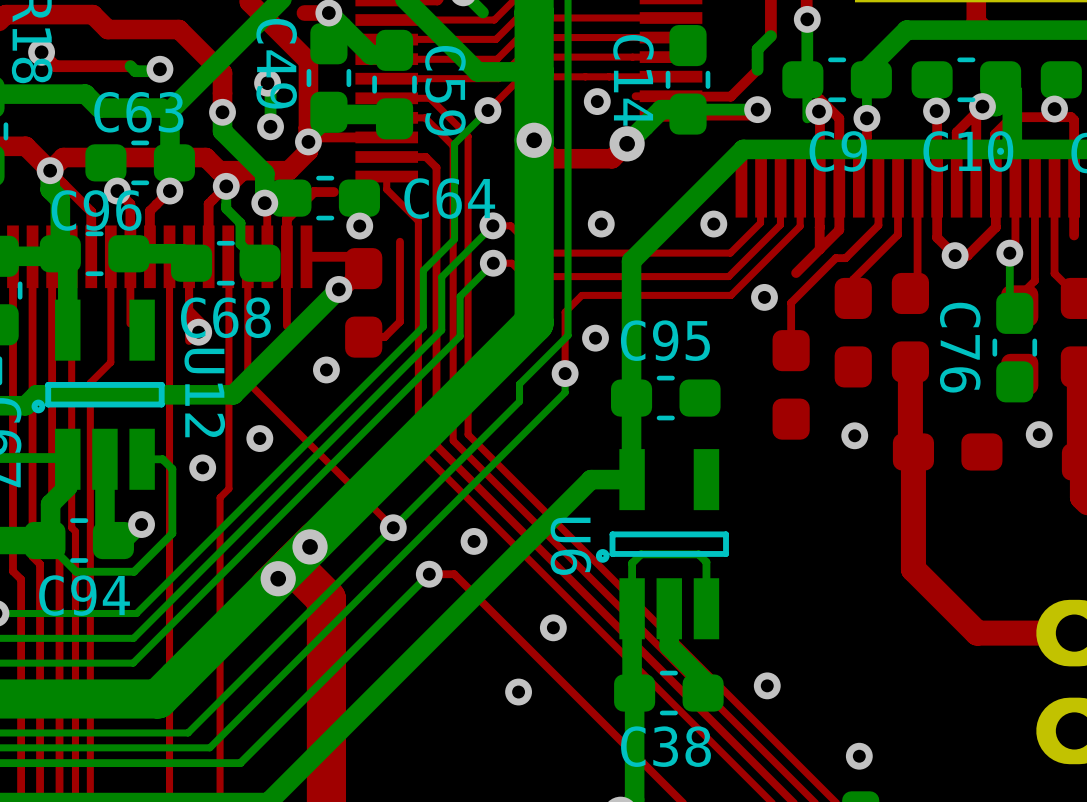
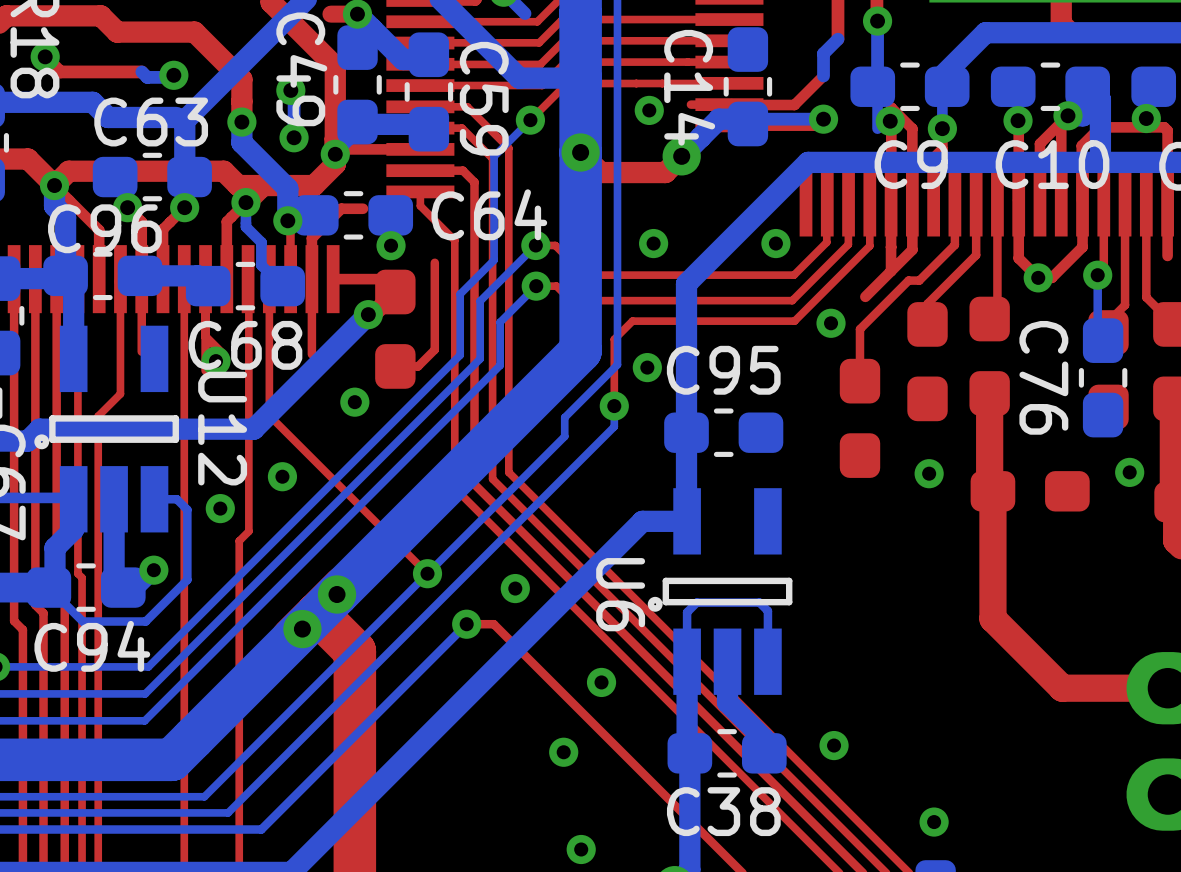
via: none -> (581, 849)

